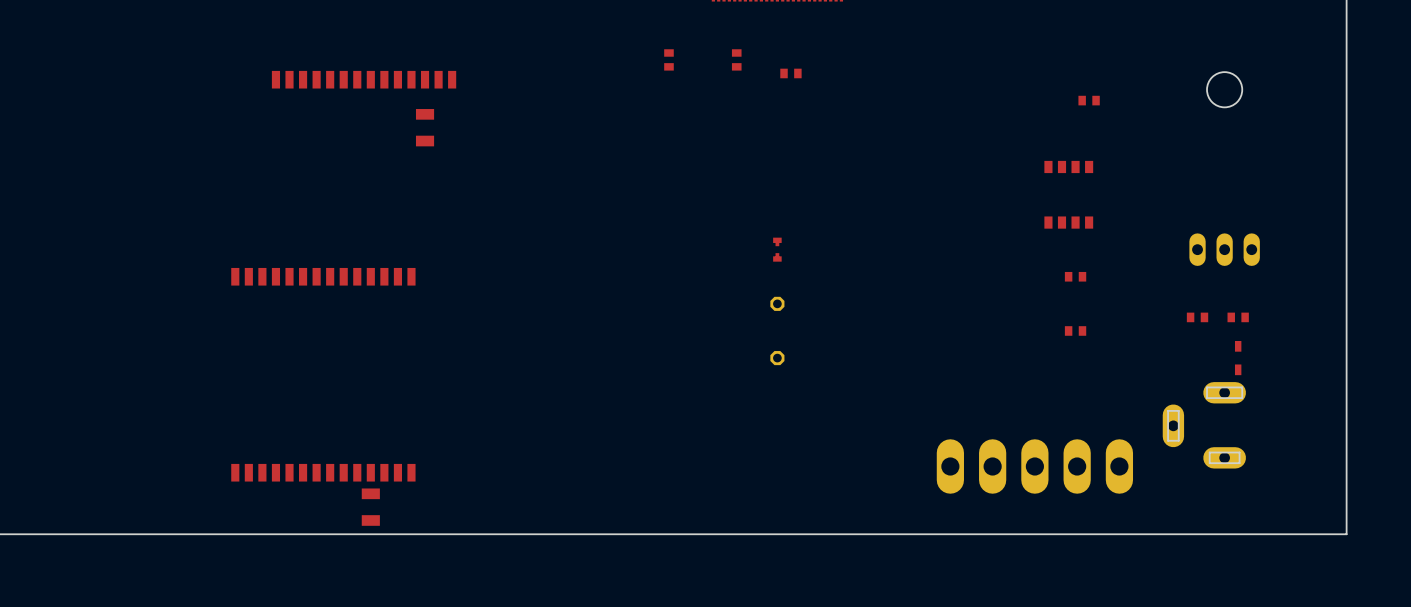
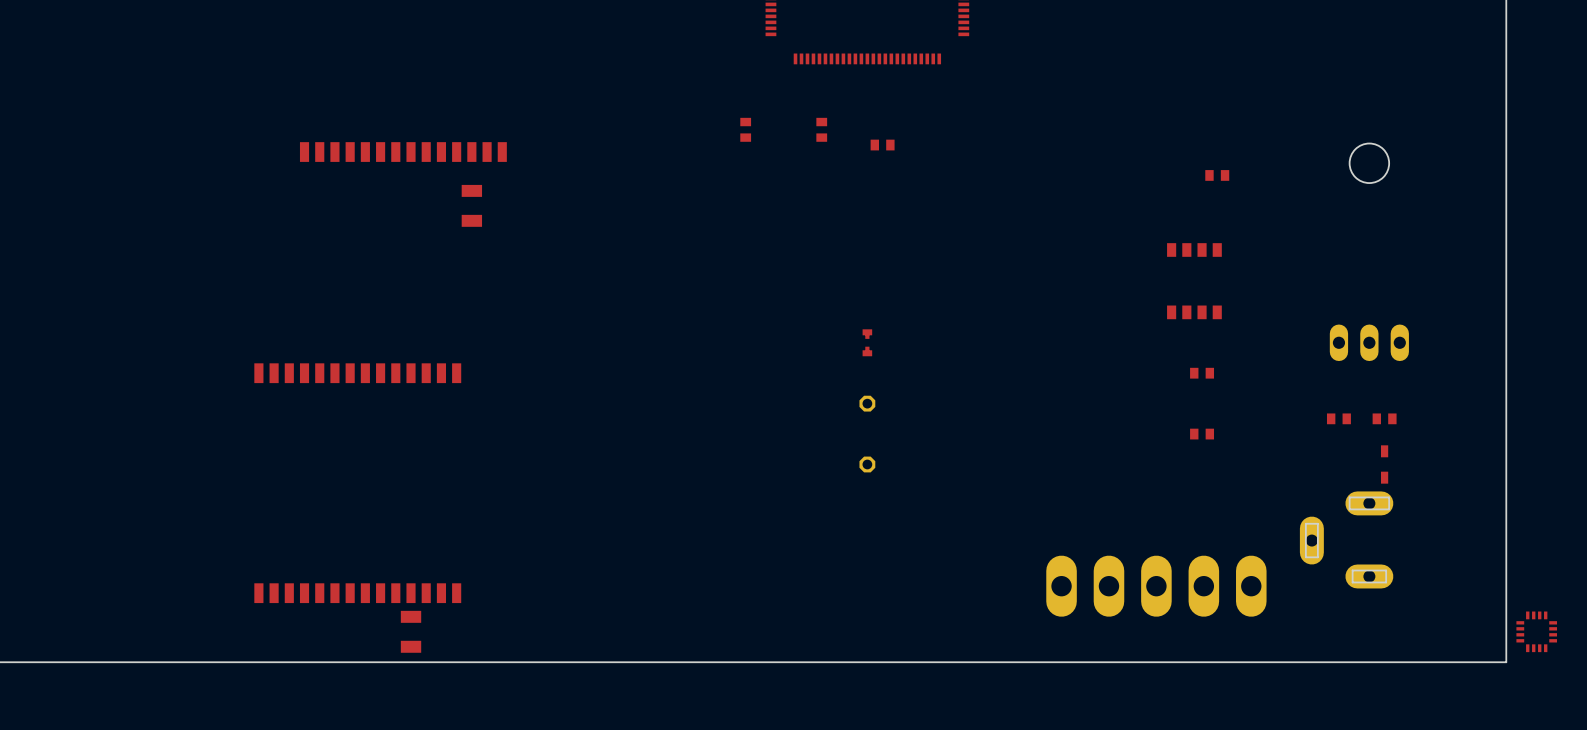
part: none -> (1536, 631)

